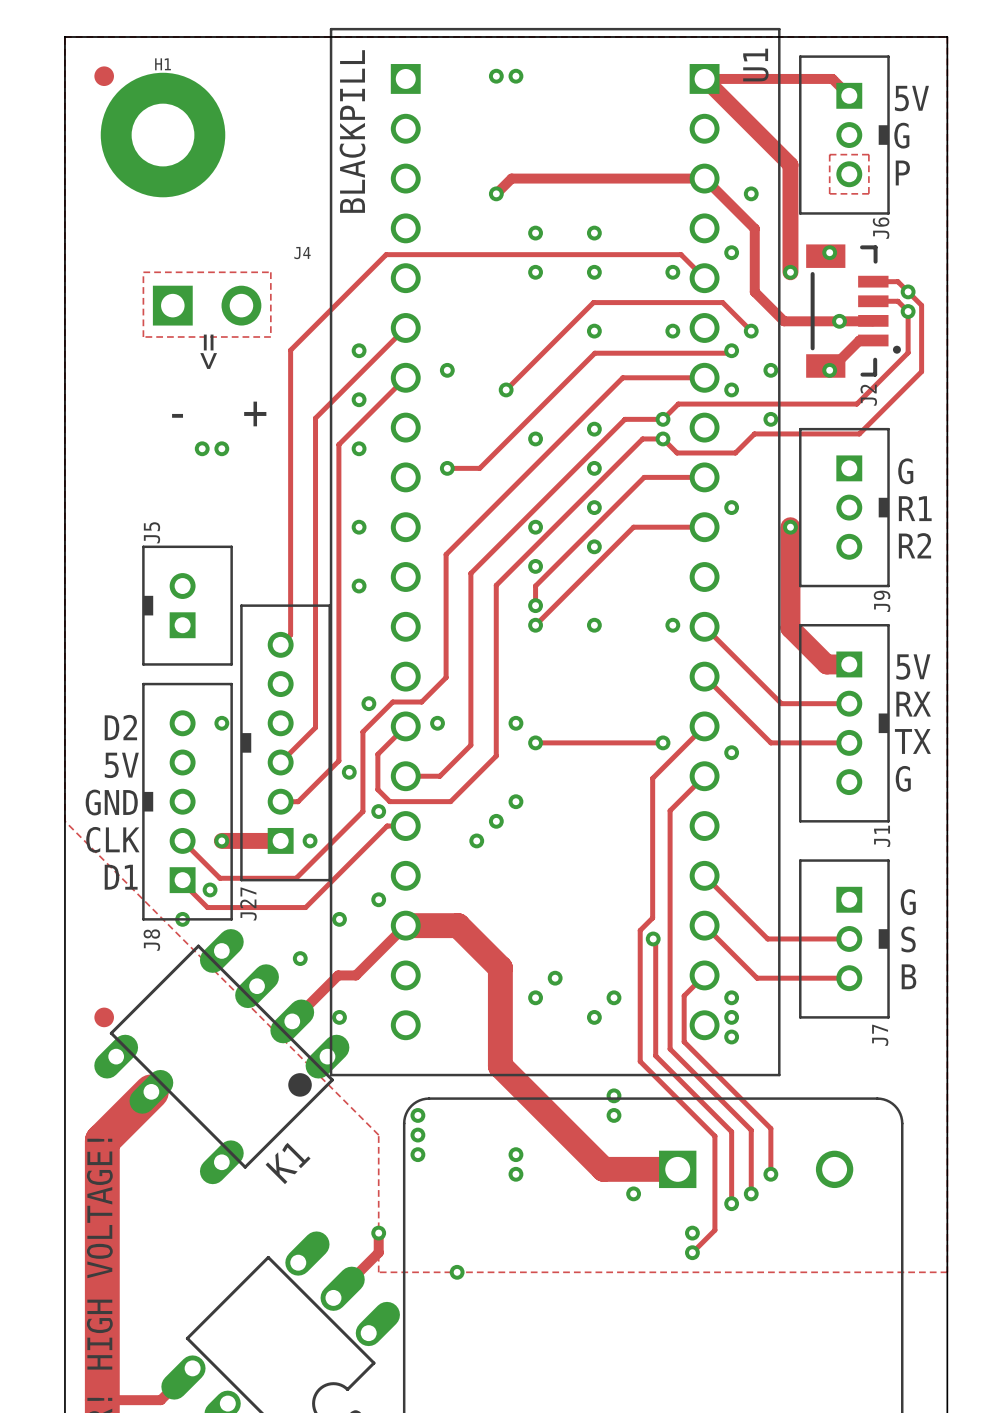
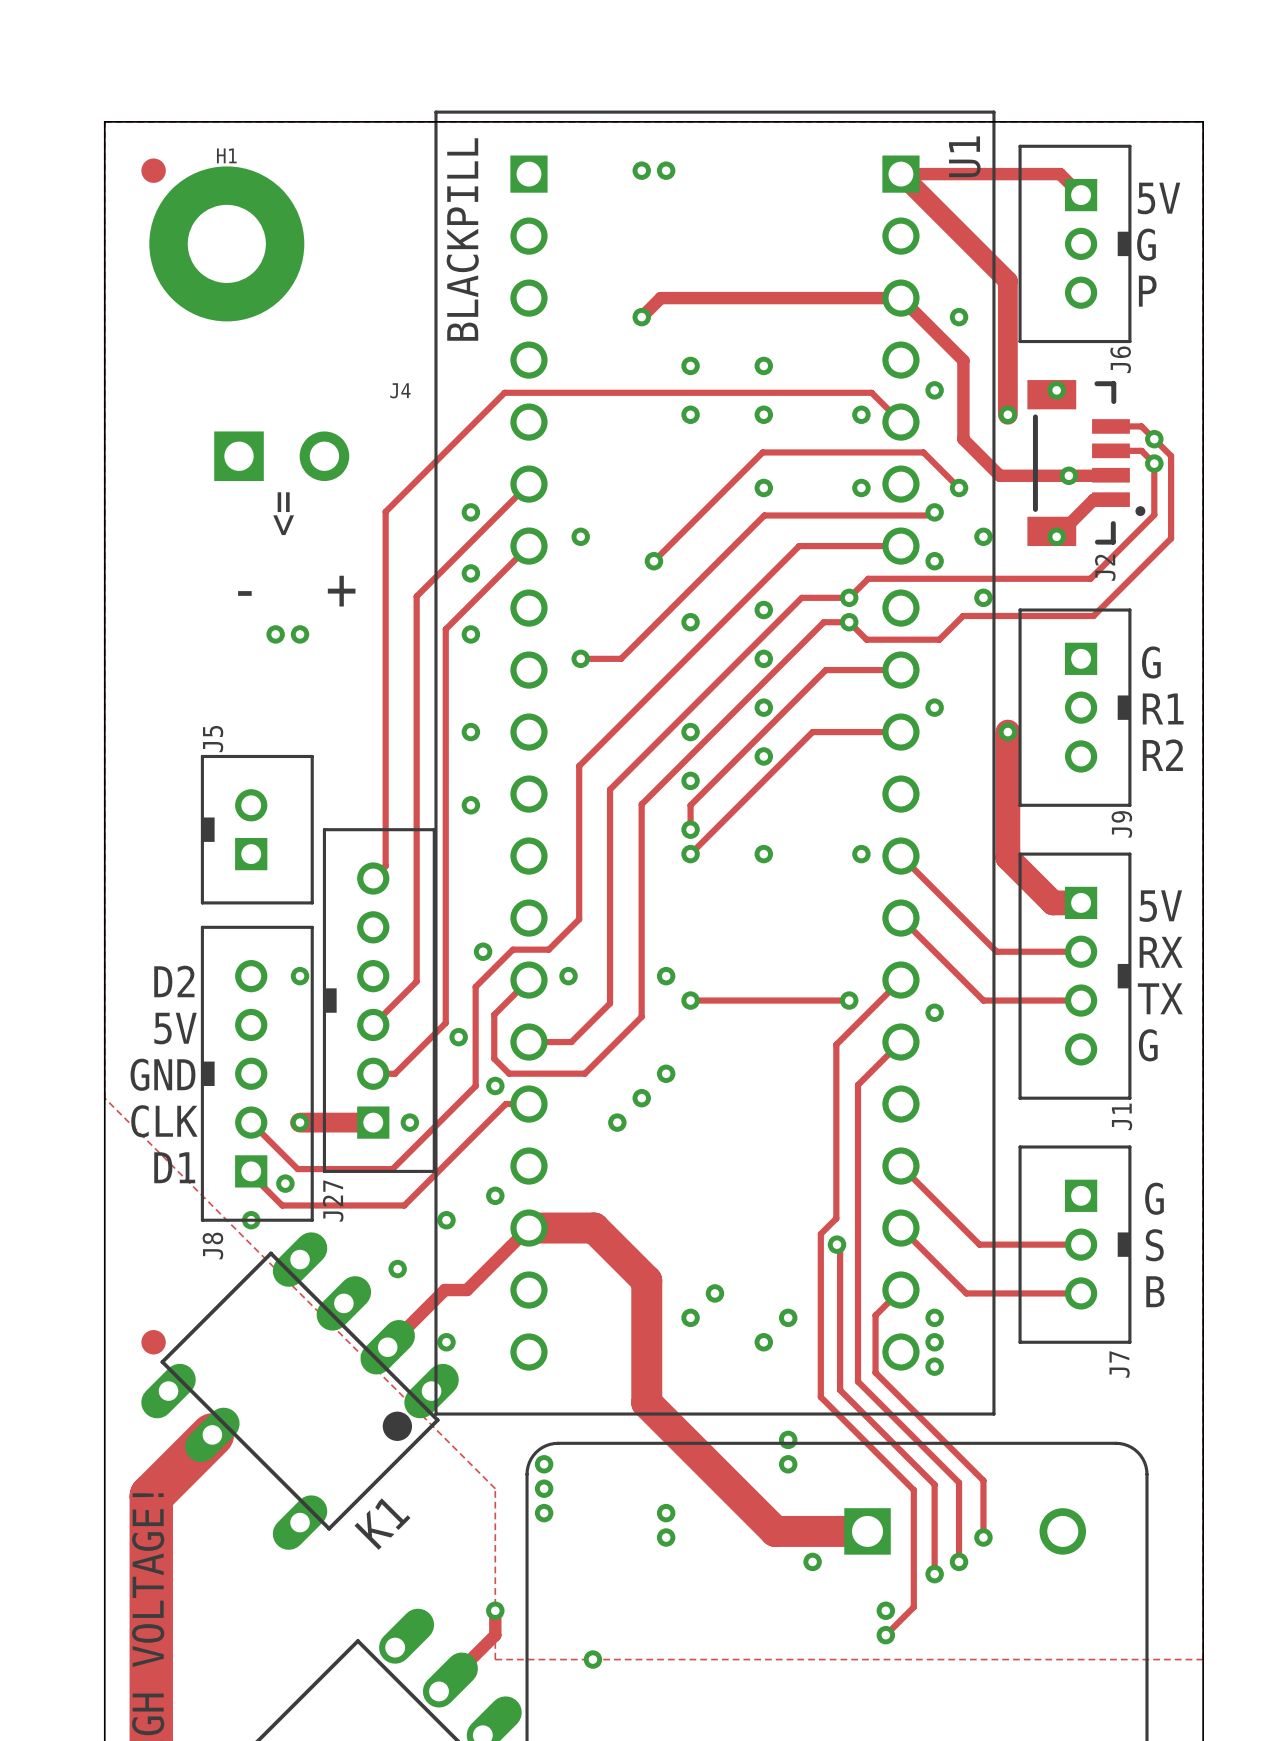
zone outline: (829, 154) (868, 154) (868, 193) (829, 193) (829, 154) -> none
zone outline: (143, 272) (270, 272) (270, 337) (143, 337) (143, 272) -> none

